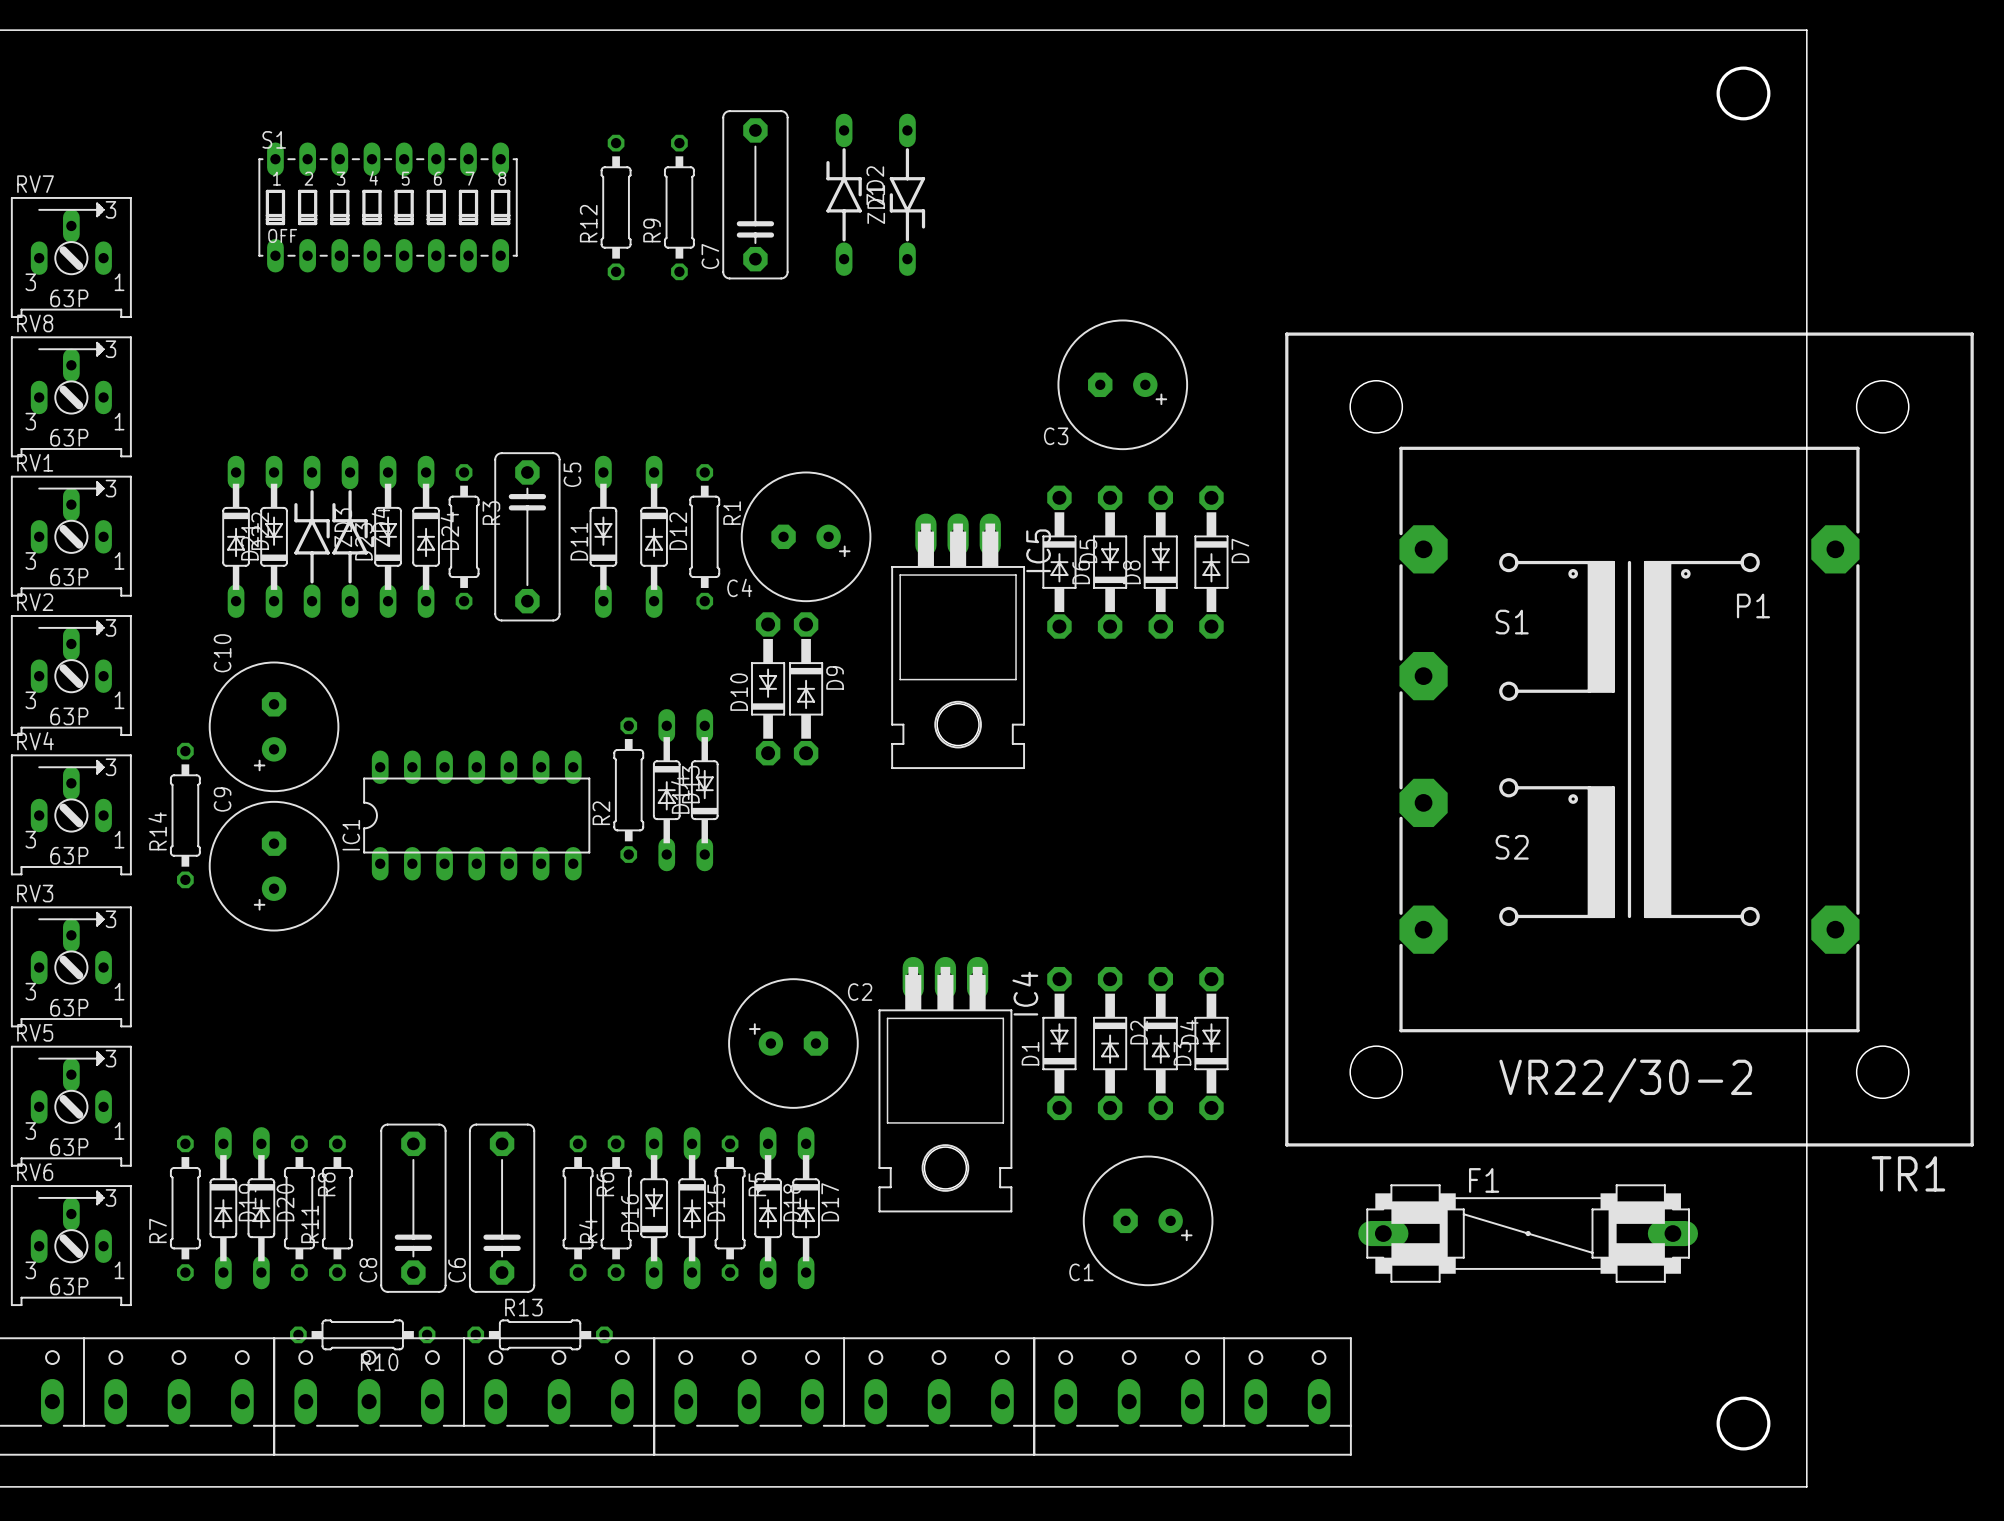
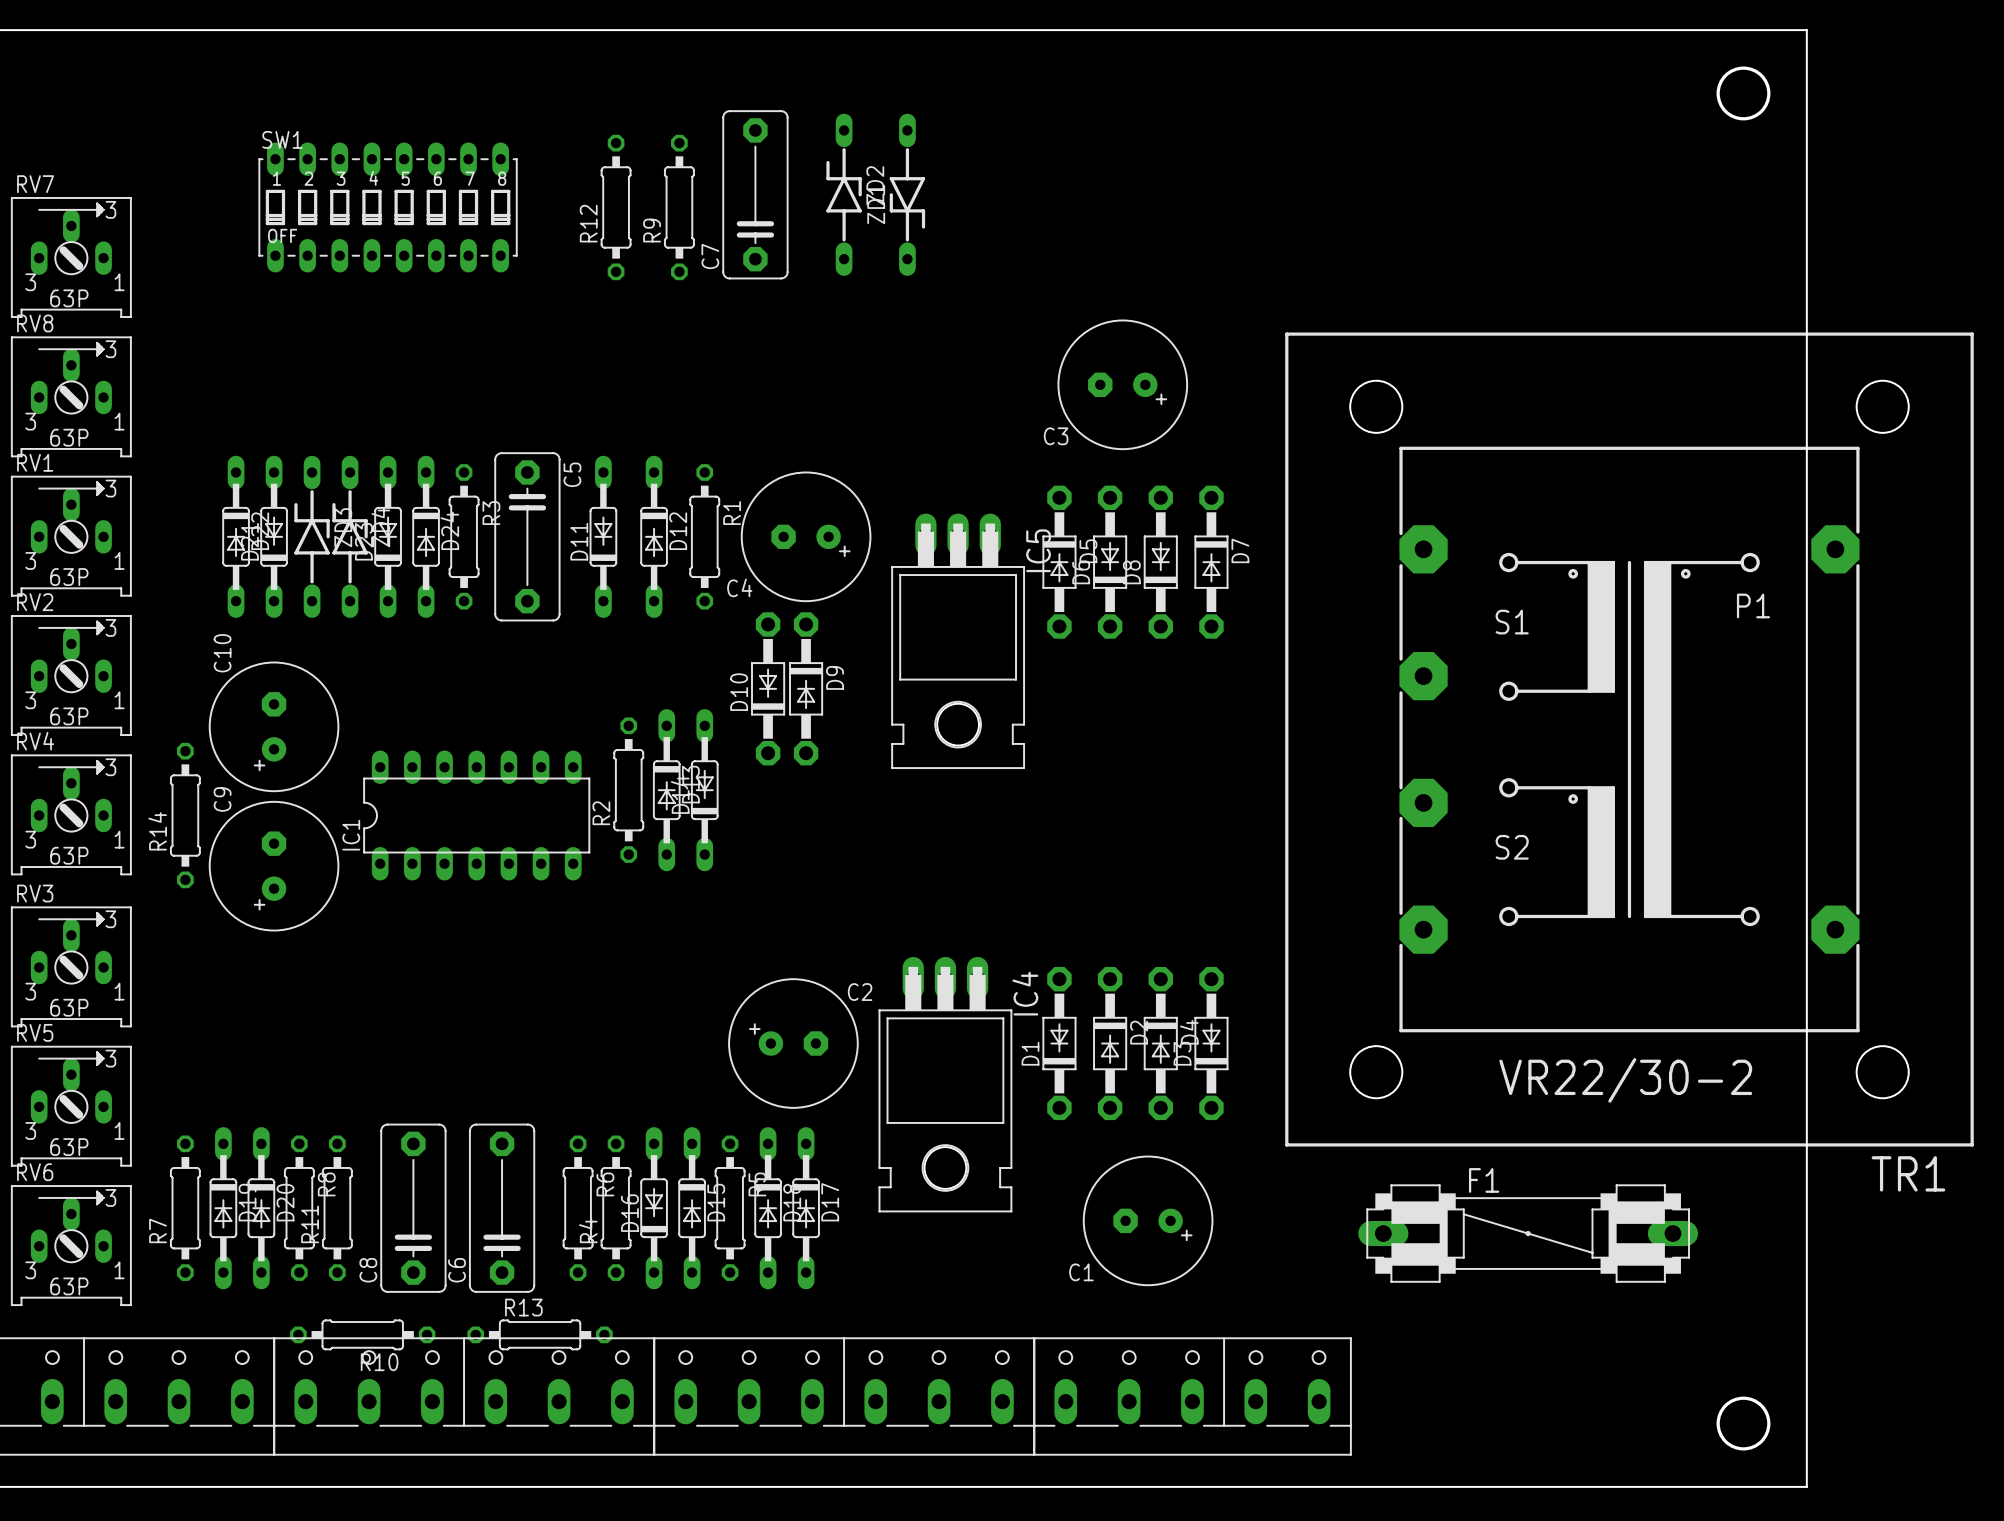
S1 name: S1 (274, 139) -> SW1 (282, 139)

